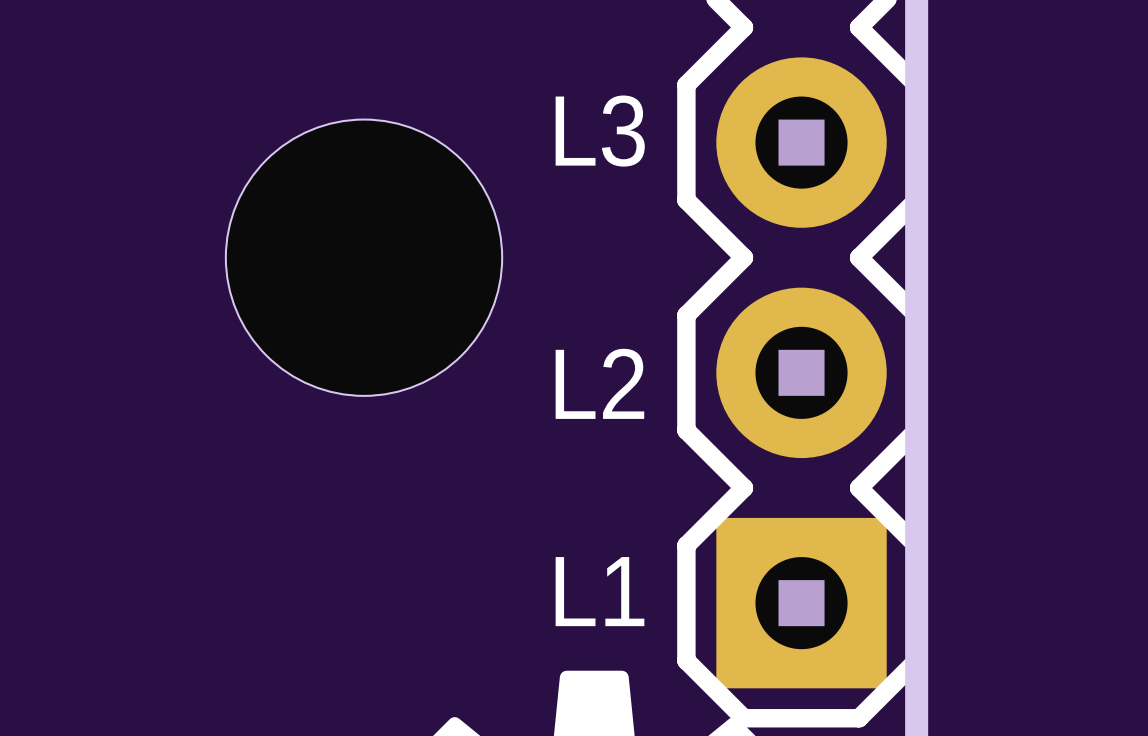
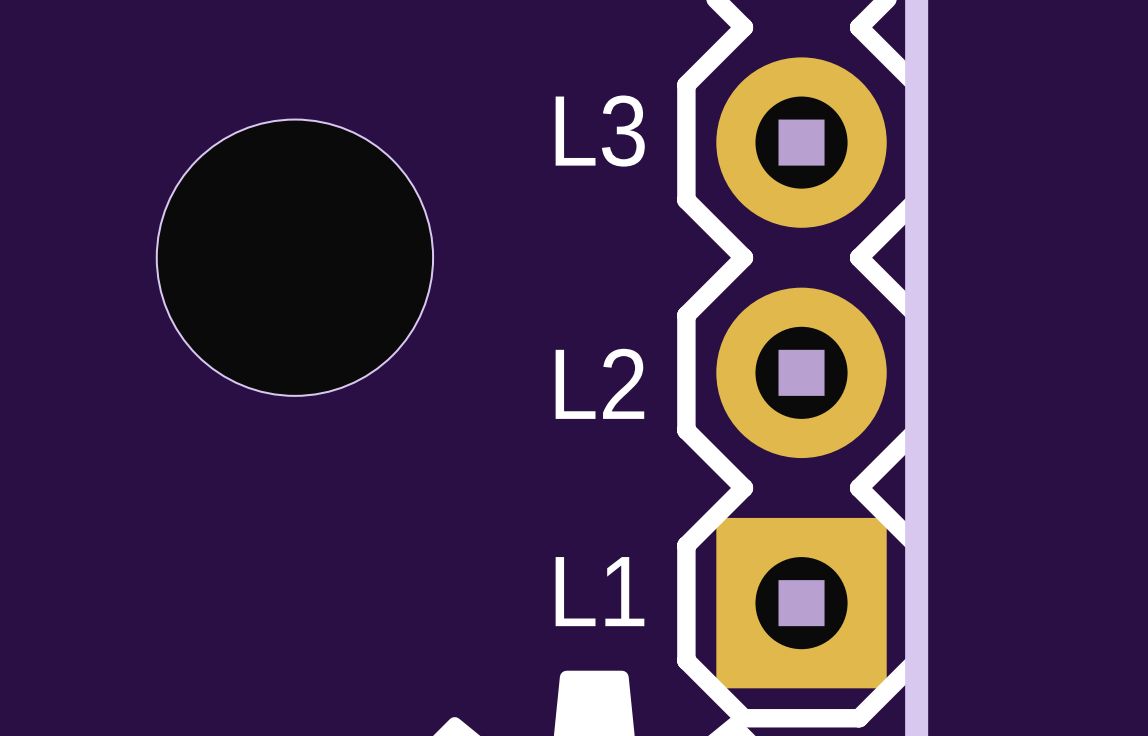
hole position: (364, 257) -> (294, 257)

